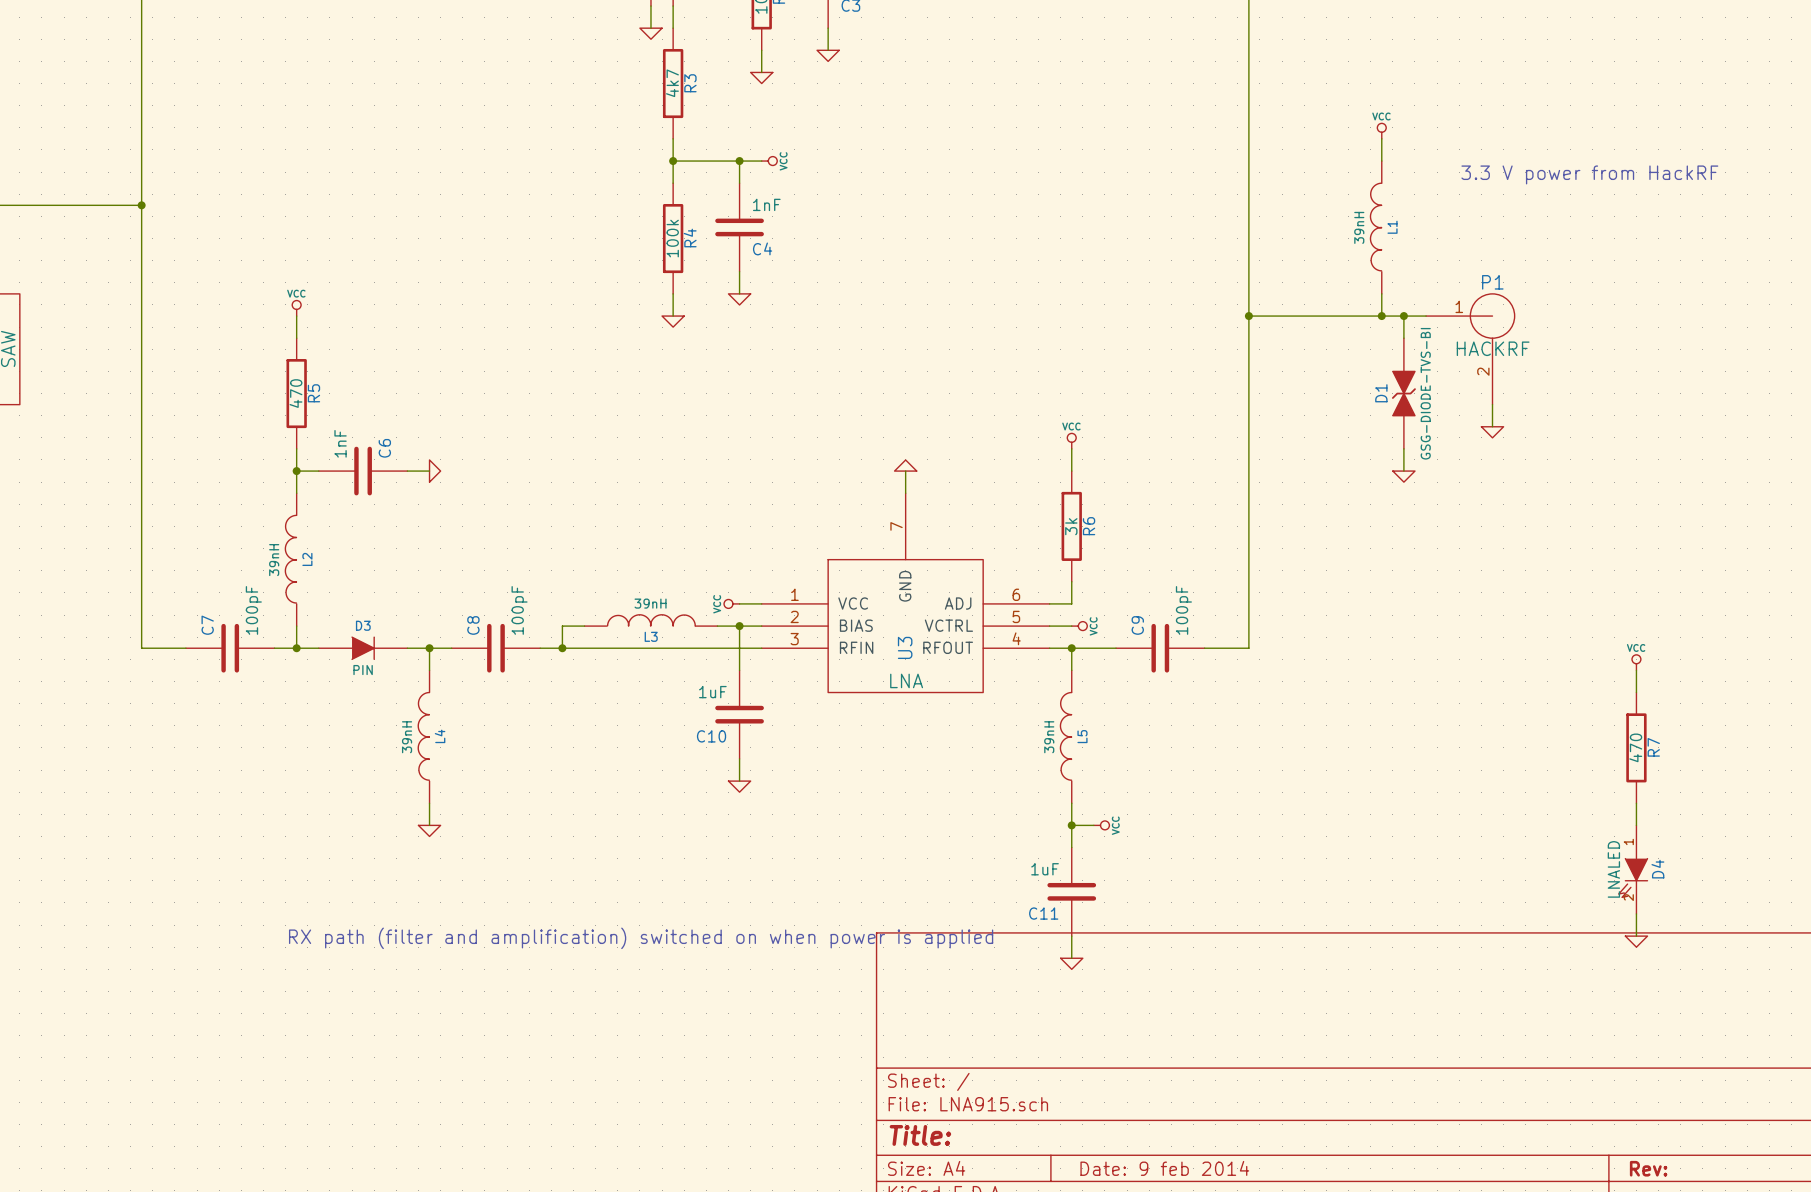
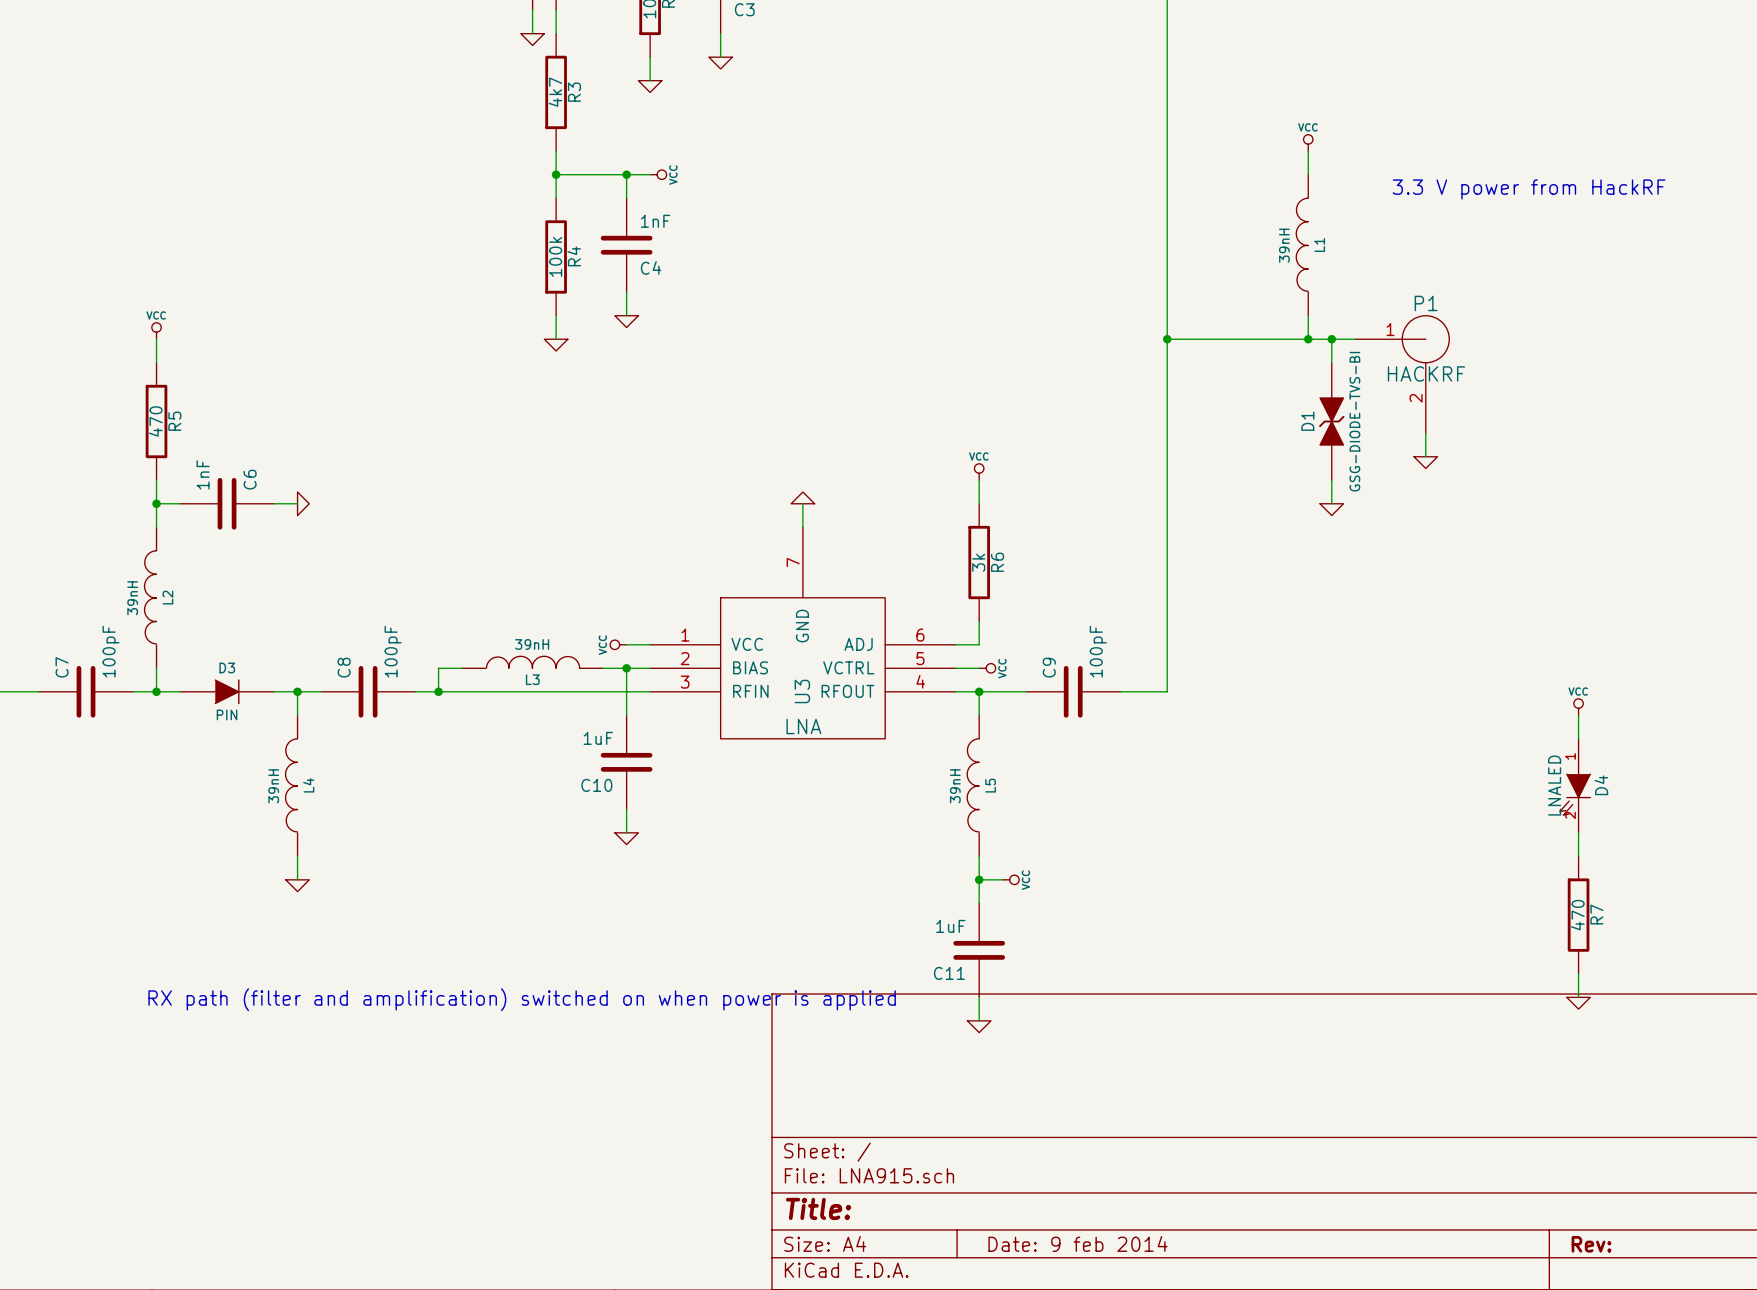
R7 position: (1636, 747) -> (1578, 915)
D4 position: (1633, 869) -> (1575, 785)

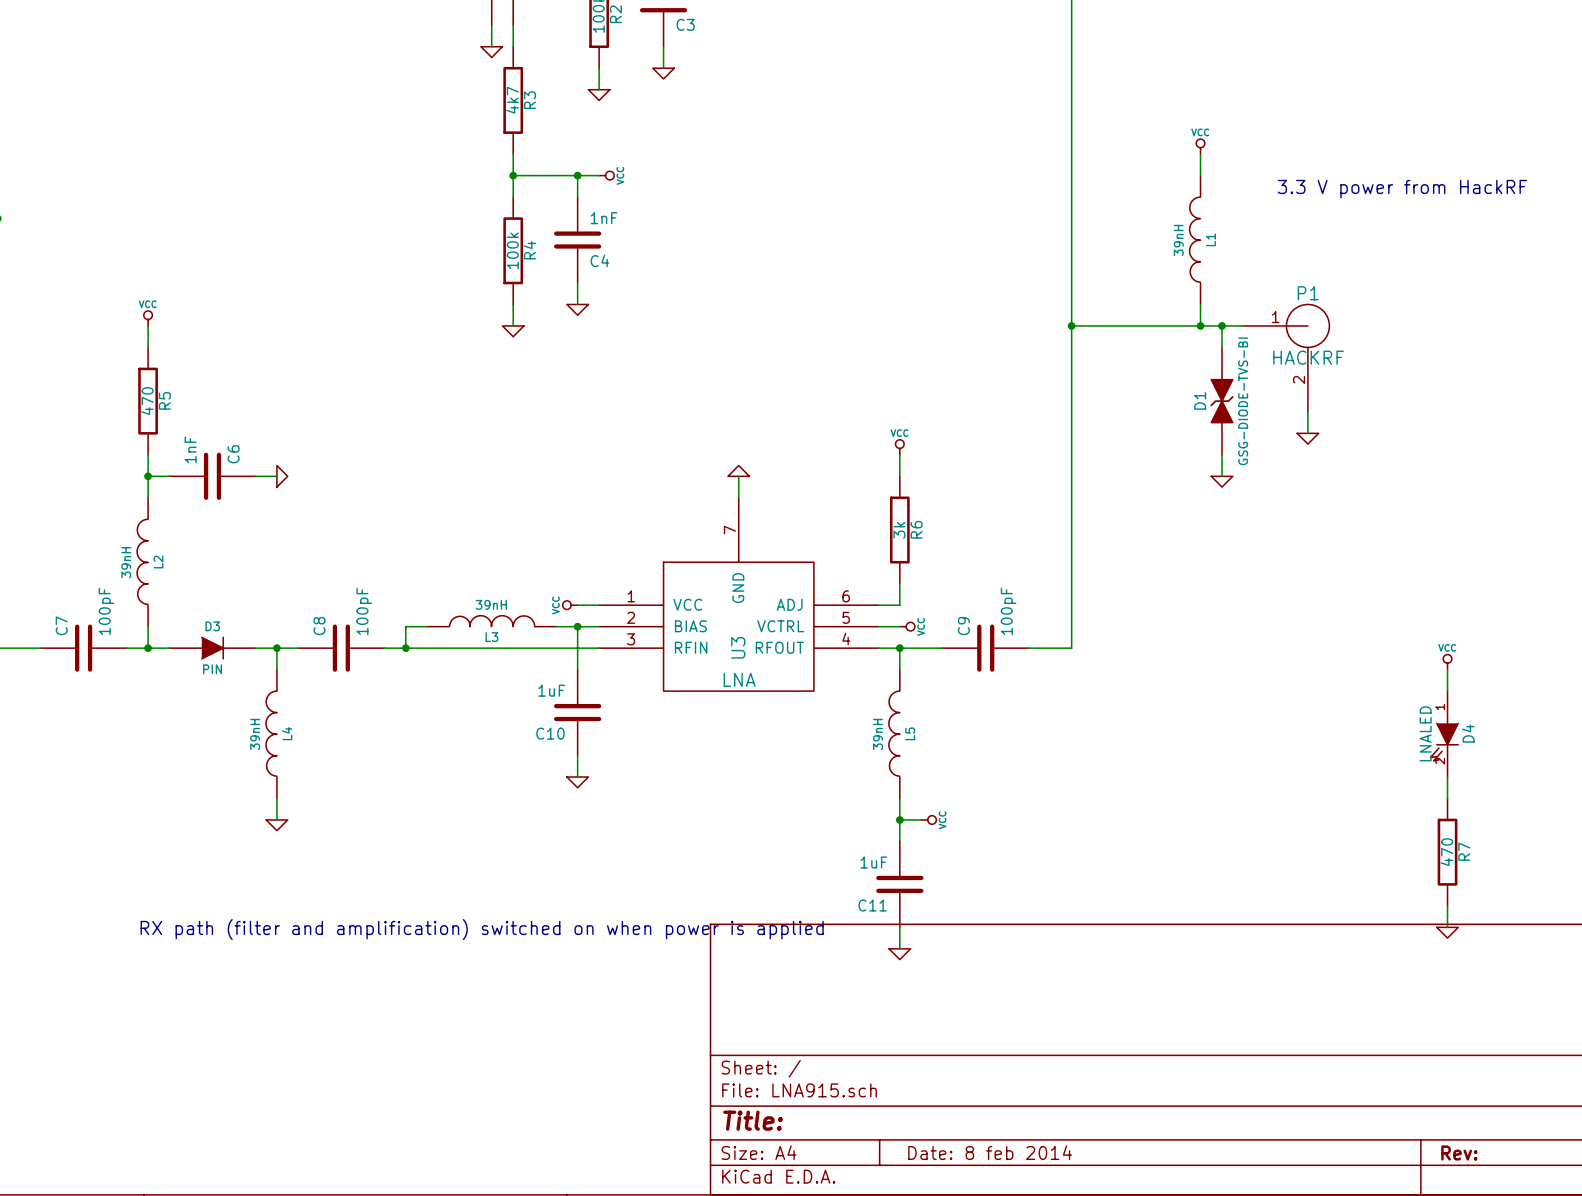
title block: Date: 9 feb 2014 (1077, 1243) -> Date: 8 feb 2014 (990, 1152)

